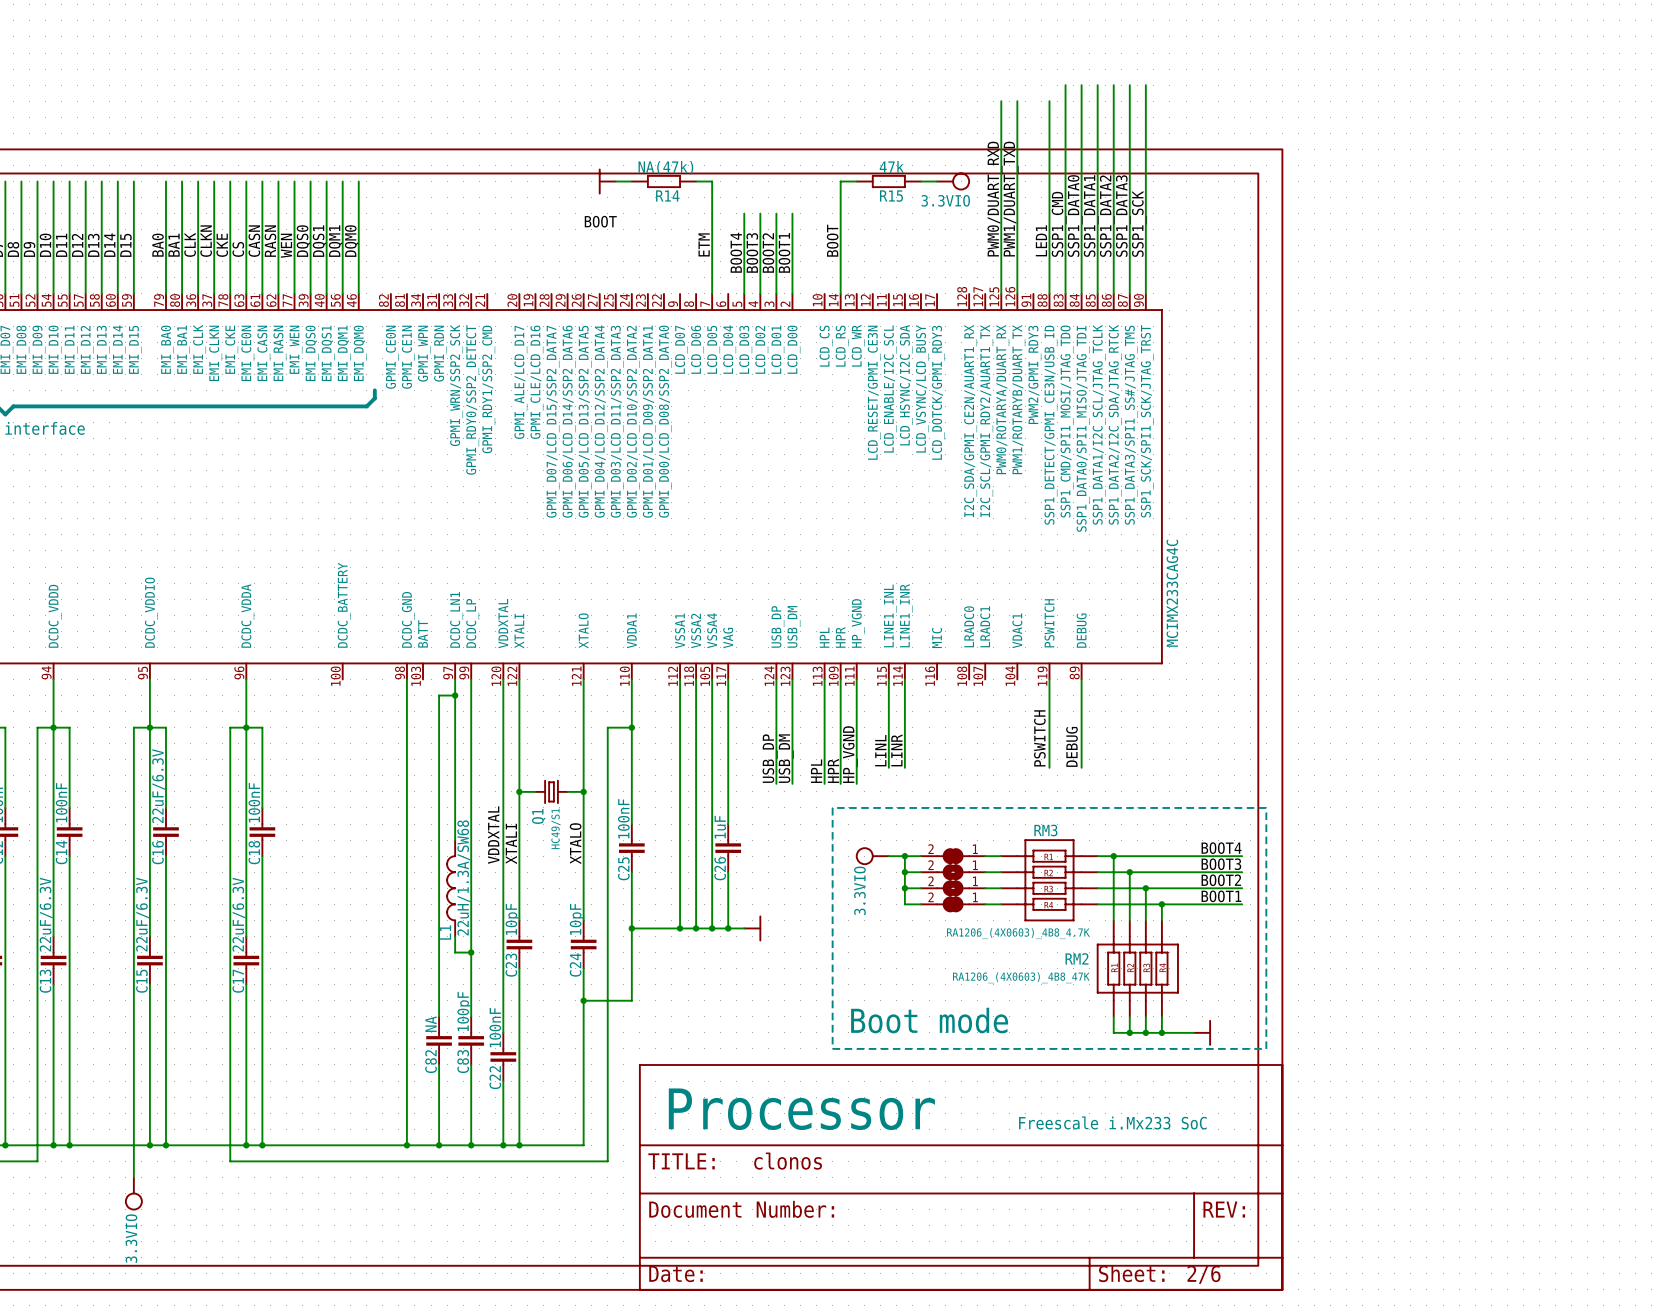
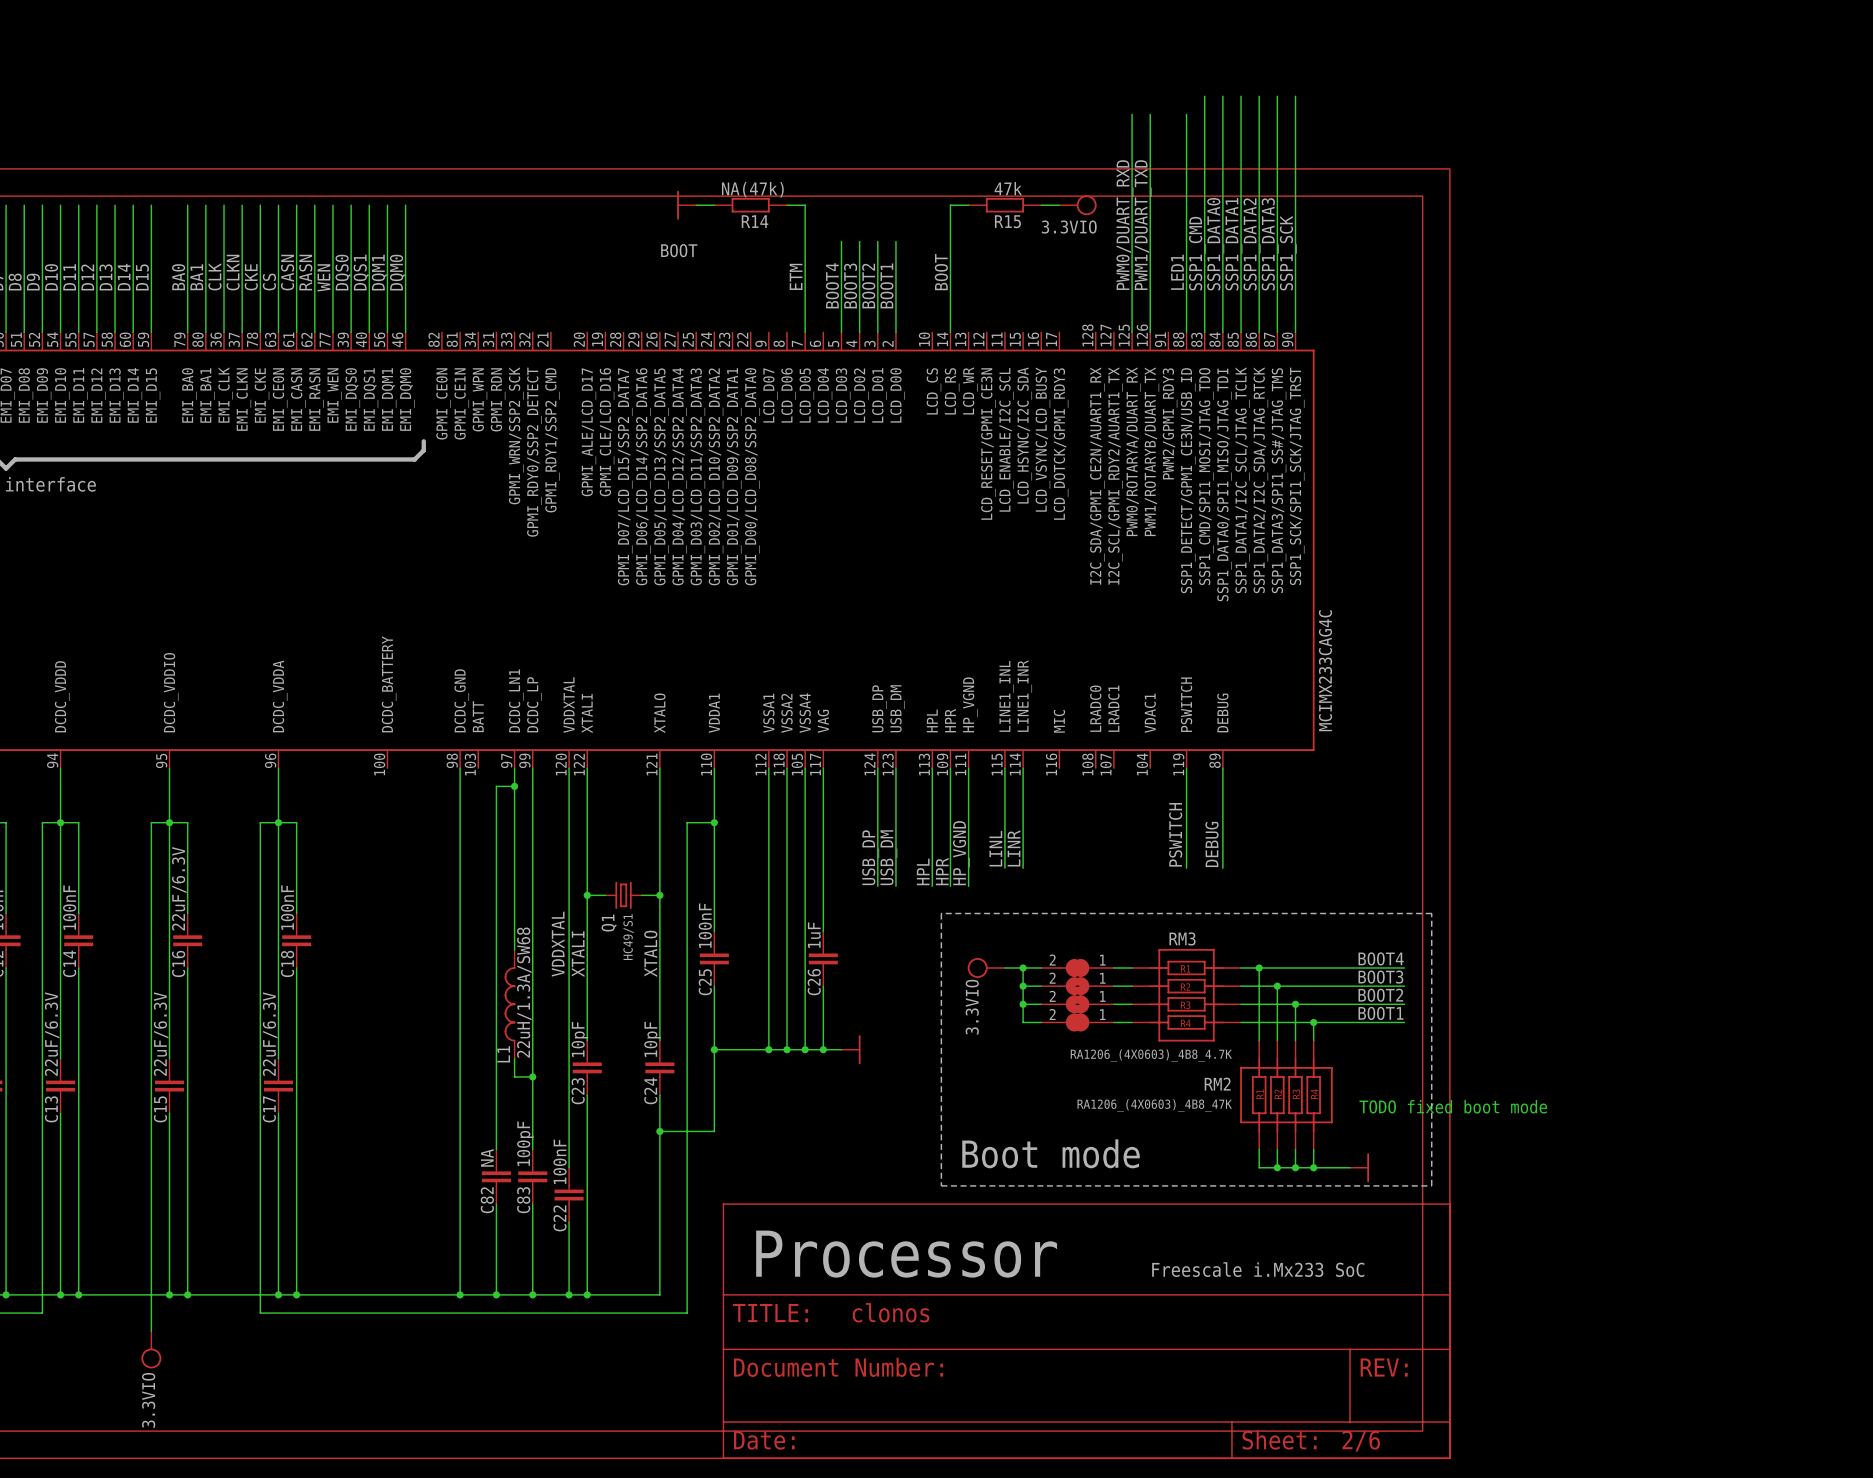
text: none -> TODO fixed boot mode (1453, 1106)

